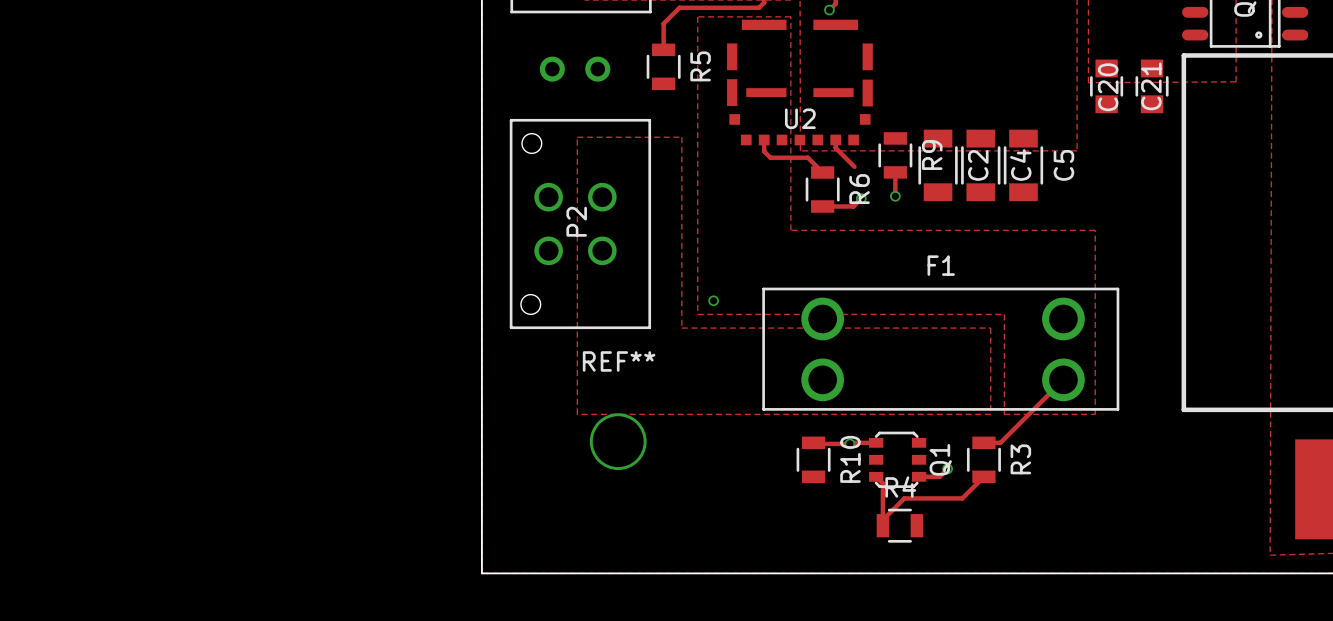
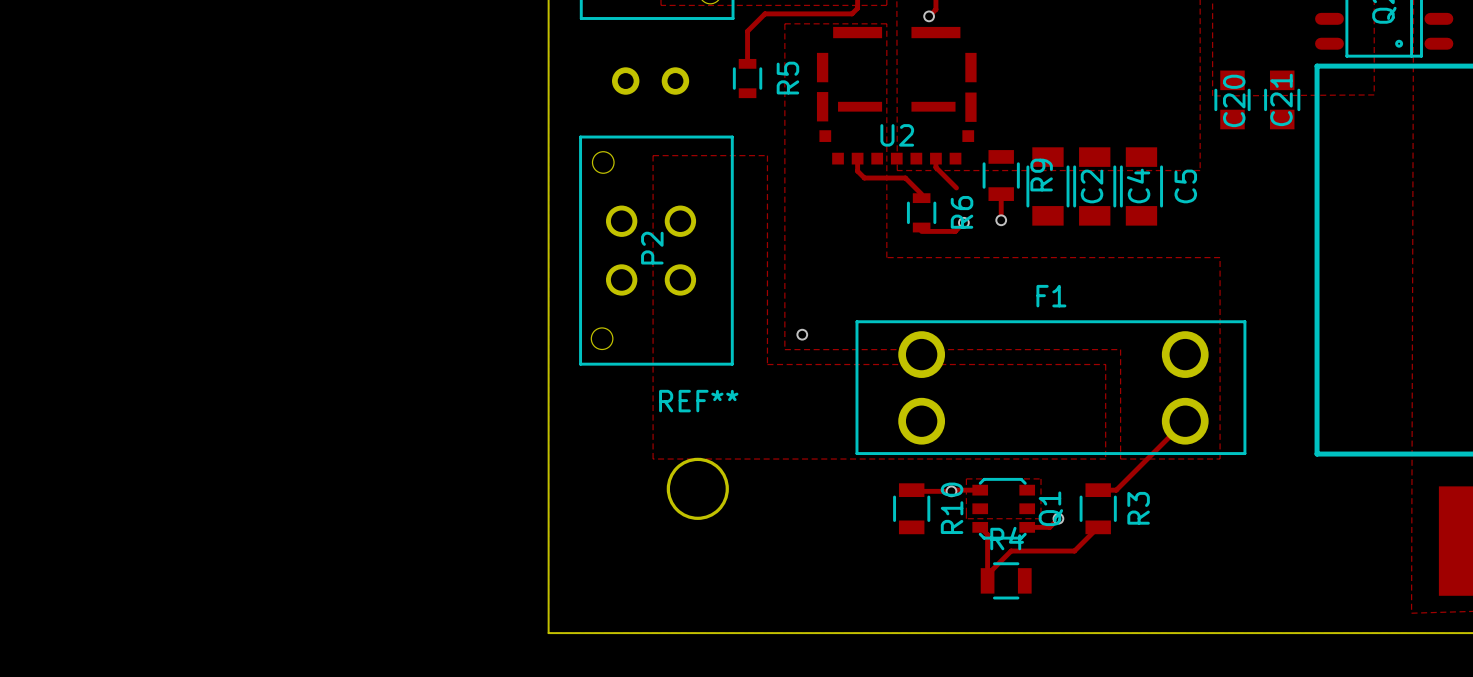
R5 footprint: [646, 43, 681, 91] -> [732, 58, 763, 99]
R6 footprint: [805, 166, 840, 213] -> [906, 193, 937, 233]
zone outline: none -> (966, 478) (966, 518) (1041, 518) (1041, 478) (966, 478)

